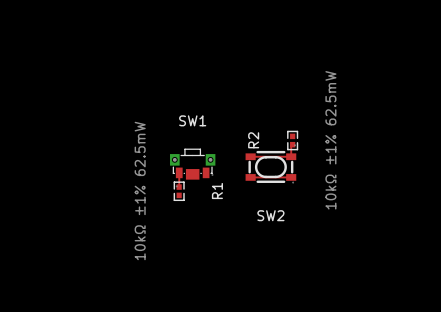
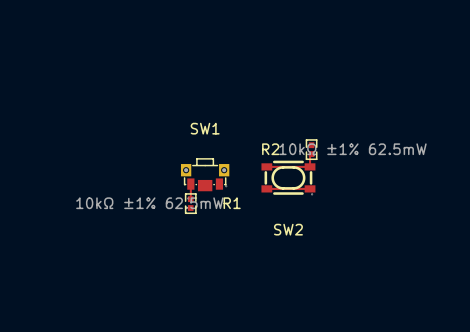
R2 name rotation: 0° (253, 140) -> 90° clockwise (270, 149)
R2 value rotation: 0° (330, 140) -> 90° clockwise (352, 149)
R1 value rotation: 0° (140, 191) -> 90° clockwise (149, 203)
R1 name rotation: 0° (217, 191) -> 90° clockwise (232, 203)

